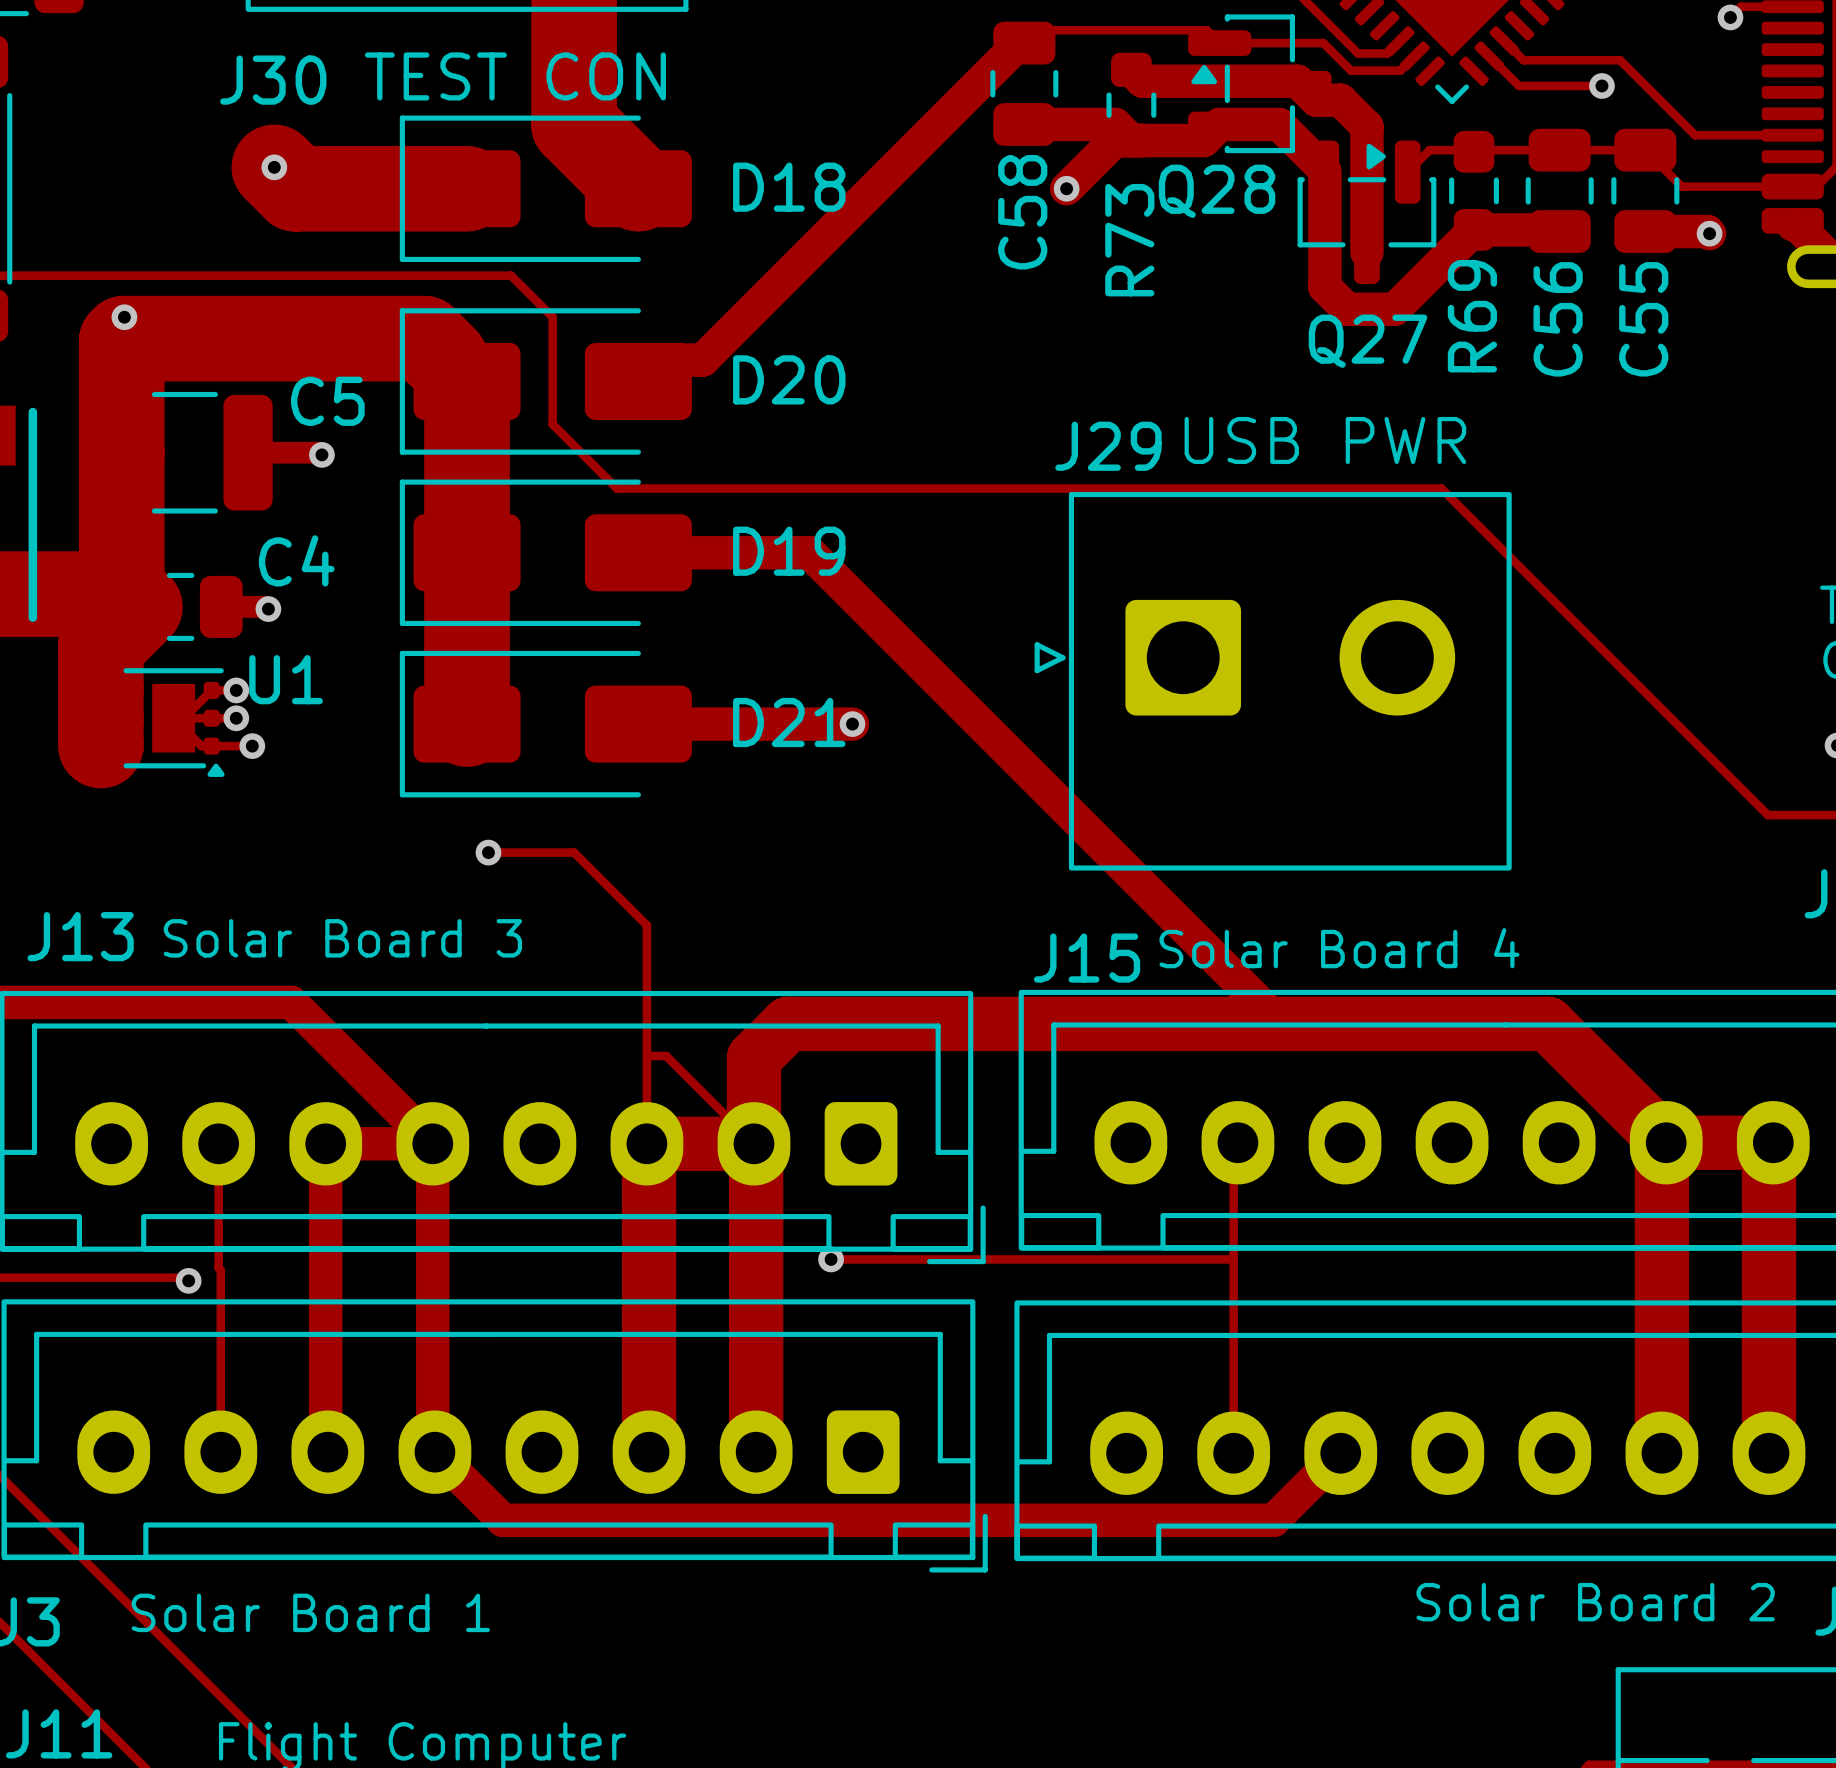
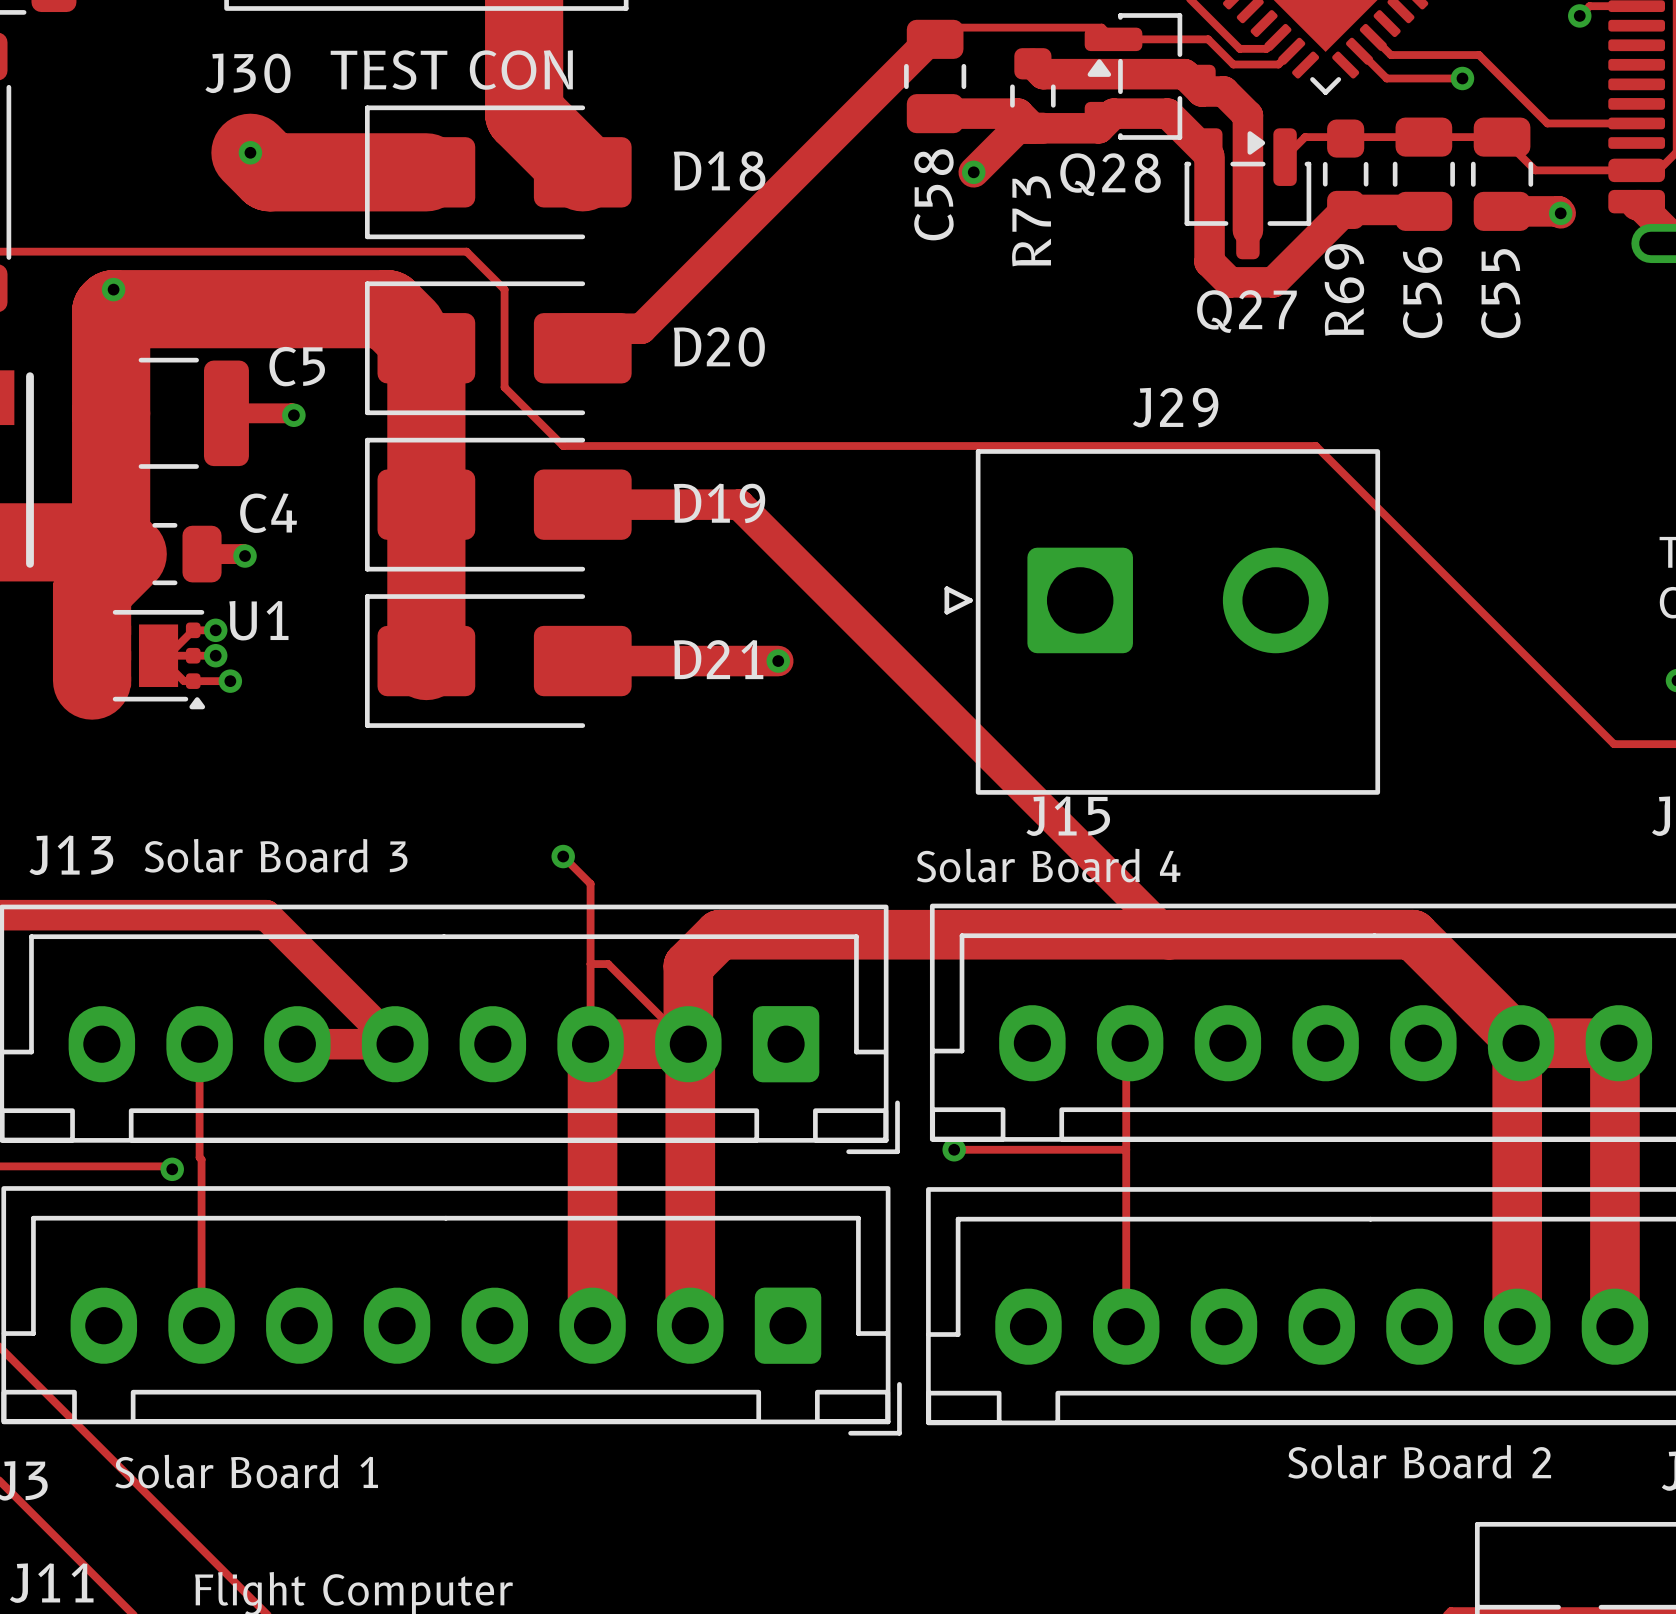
text: USB PWR (1325, 440) -> none
J29 name position: J29 (1108, 446) -> J29 (1175, 407)
track: (488, 852) (574, 852) (646, 925) (646, 968) -> (563, 856) (590, 883)
via position: (488, 852) -> (563, 856)
text position: Solar Board 4 (1339, 948) -> Solar Board 4 (1048, 865)
J15 name position: J15 (1087, 958) -> J15 (1068, 816)
track: (325, 1143) (325, 1450) (327, 1452) -> none
track: (432, 1143) (432, 1450) (503, 1520) (1273, 1520) (1340, 1453) -> none
track: (831, 1259) (1045, 1259) -> none
via: (831, 1259) -> none
via: none -> (954, 1149)

